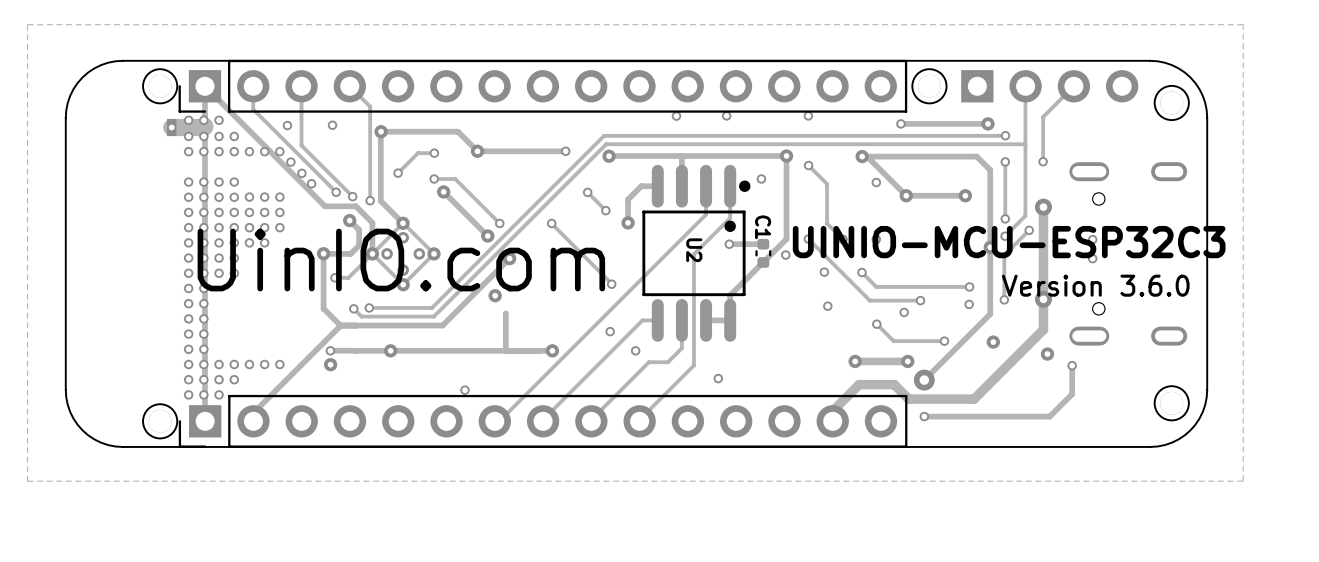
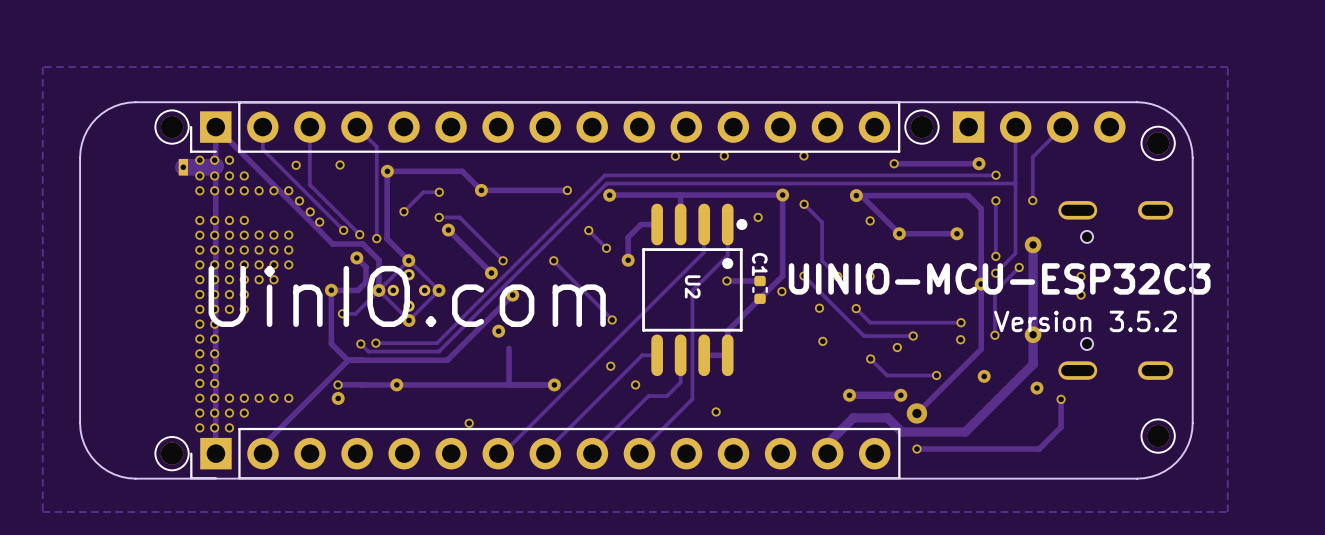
text: Version 3.6.0 (1095, 285) -> Version 3.5.2 (1085, 321)

